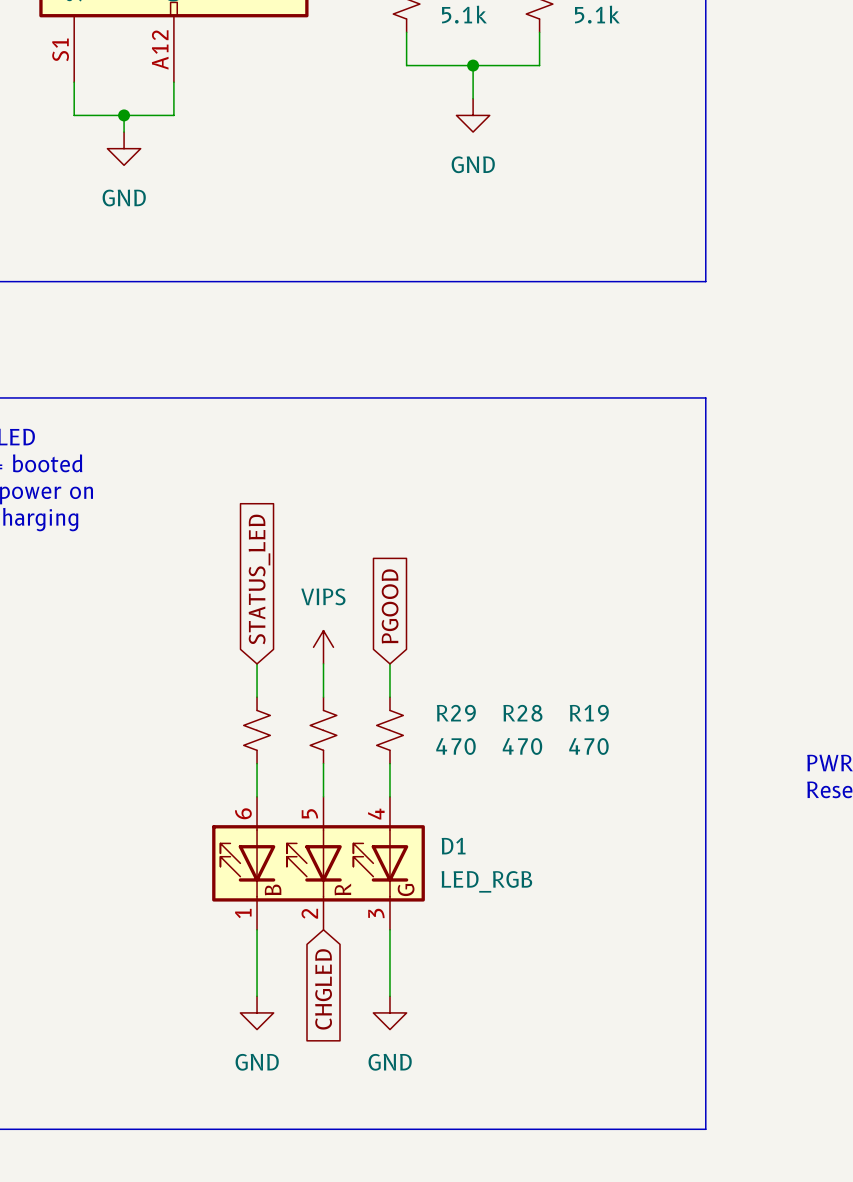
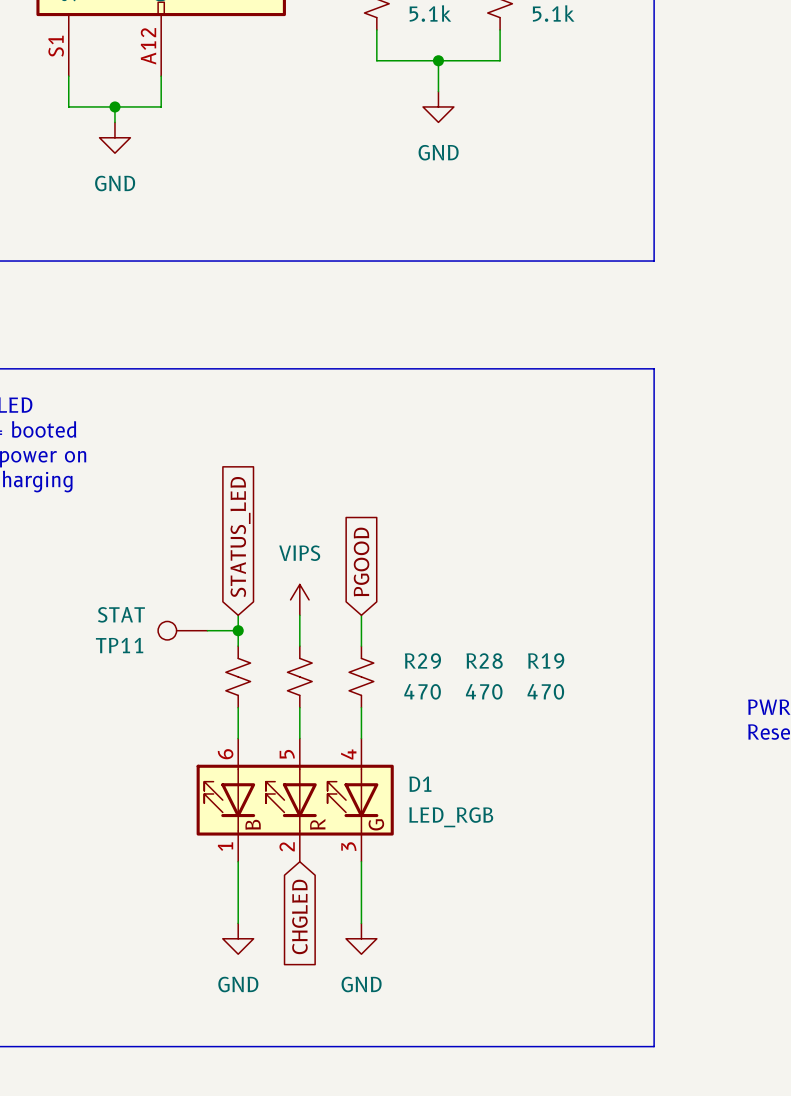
TP11: none -> STAT (182, 630)
wire: none -> (207, 630) (238, 630)
junction: none -> (238, 630)

